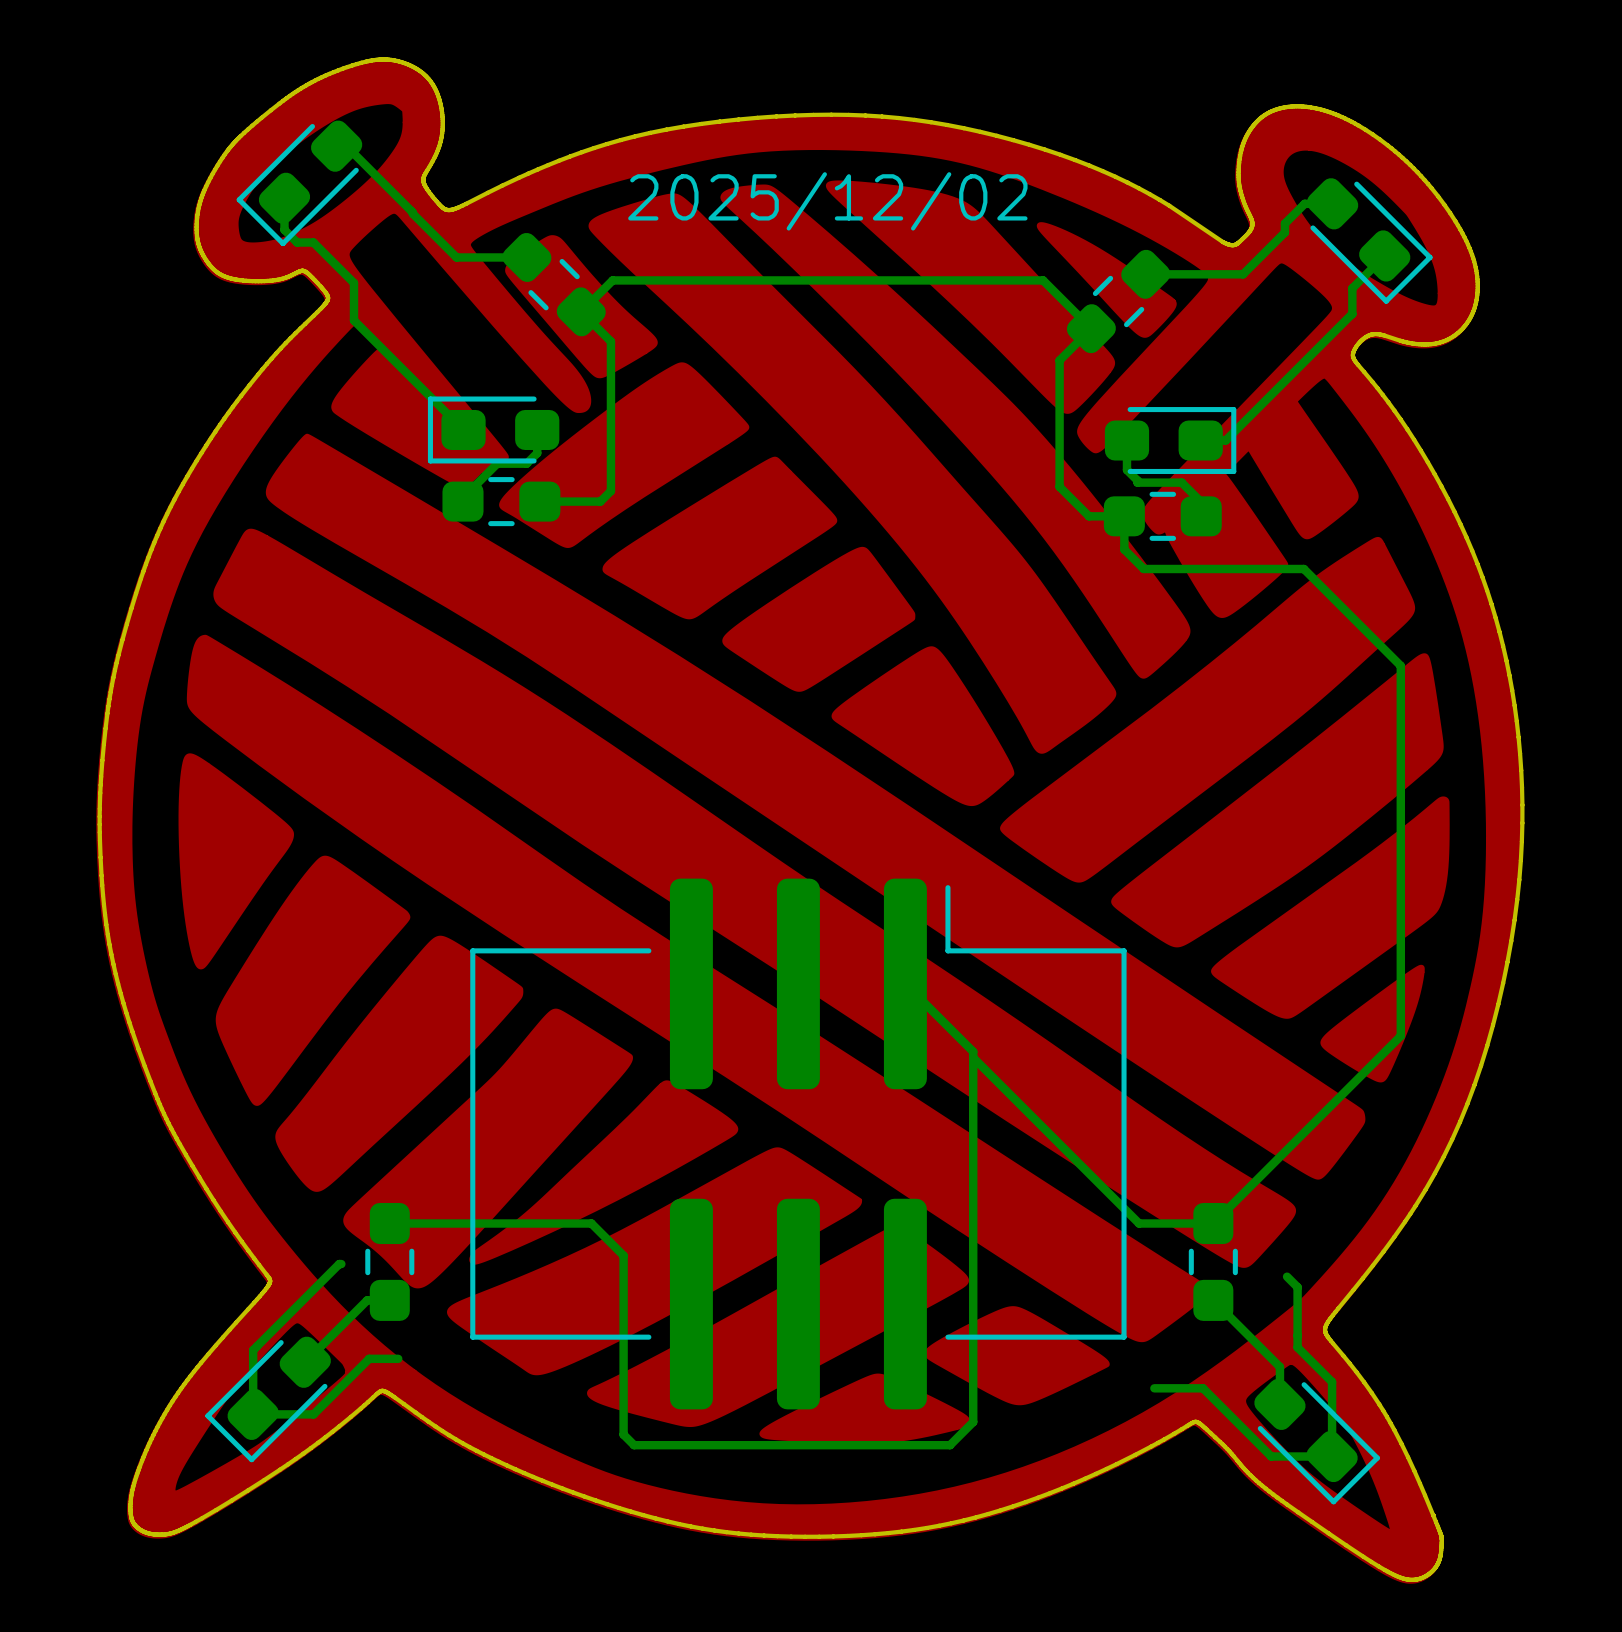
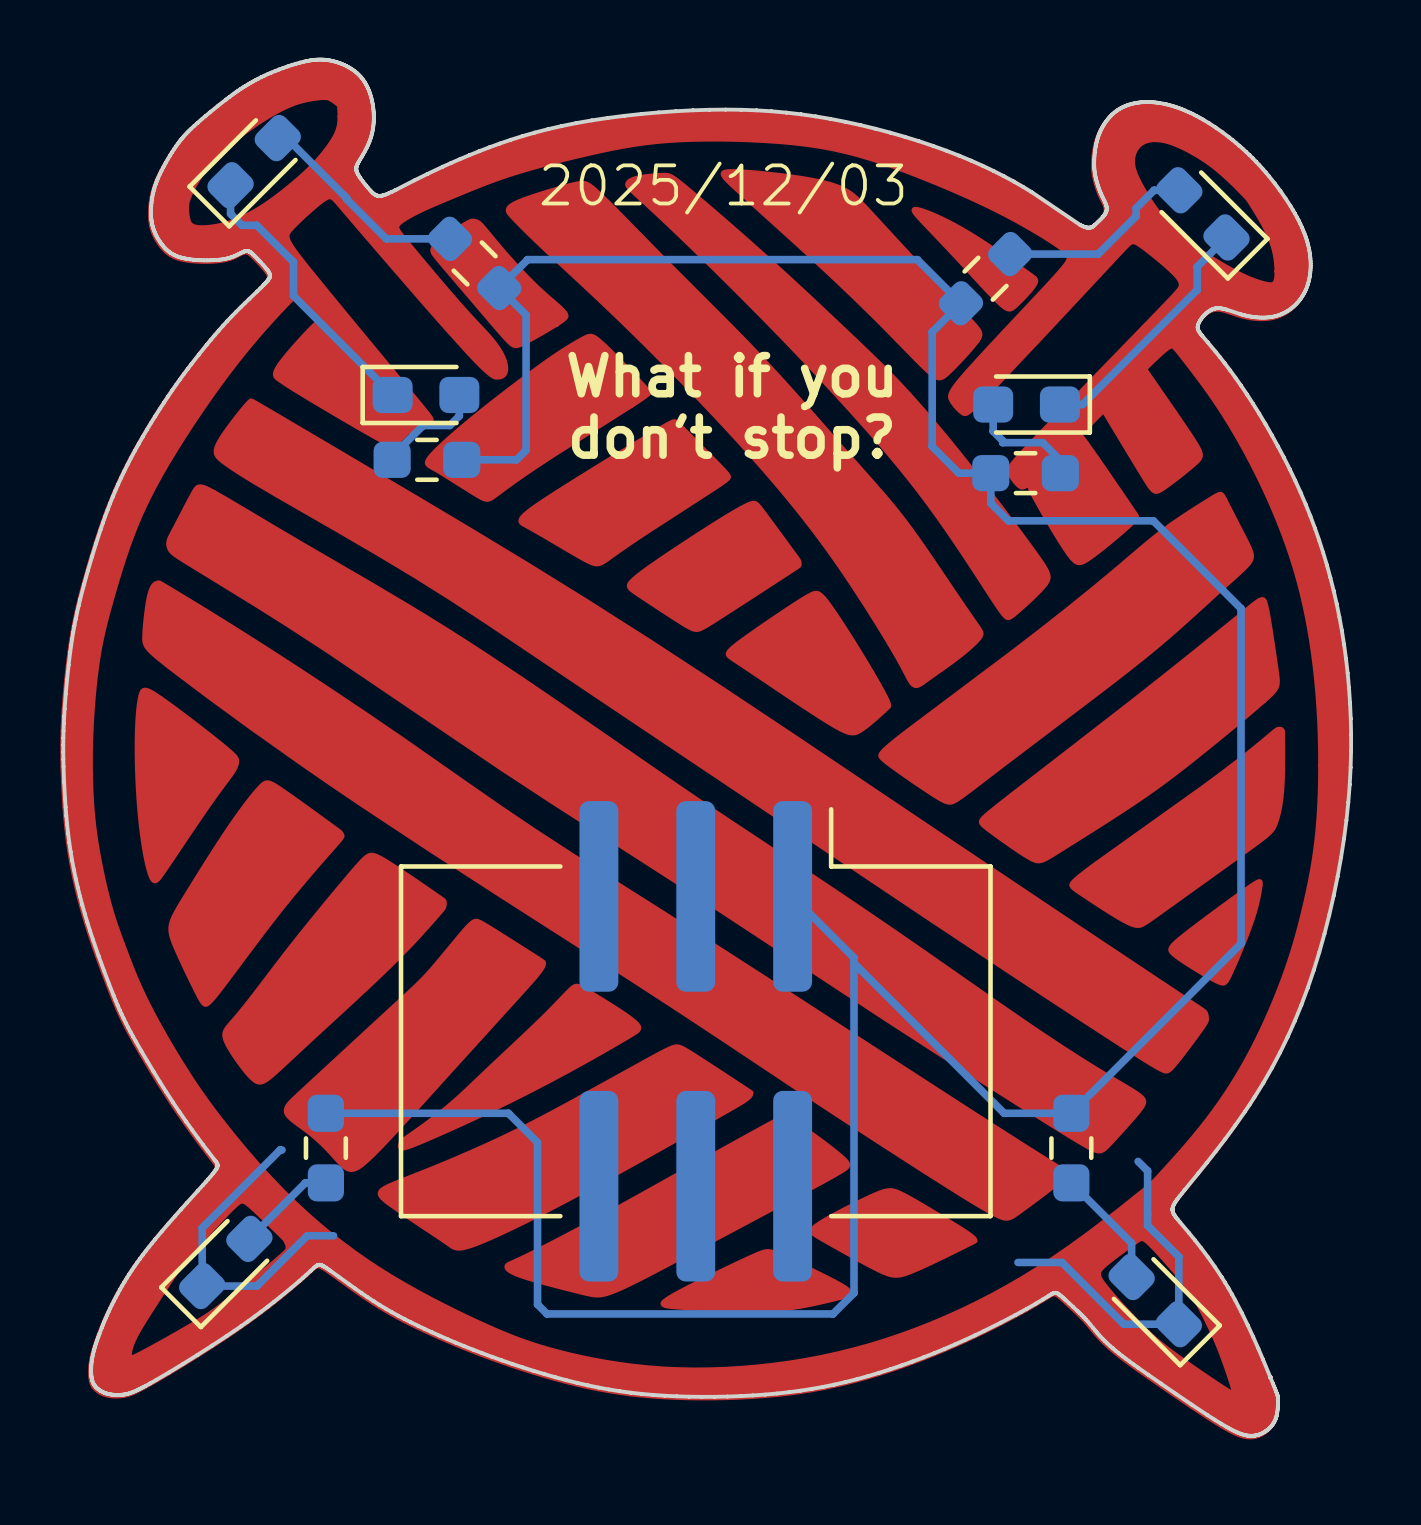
text: 2025/12/02 (827, 201) -> 2025/12/03 (722, 188)
text: none -> What if you (730, 381)
text: none -> don't stop? (731, 442)

